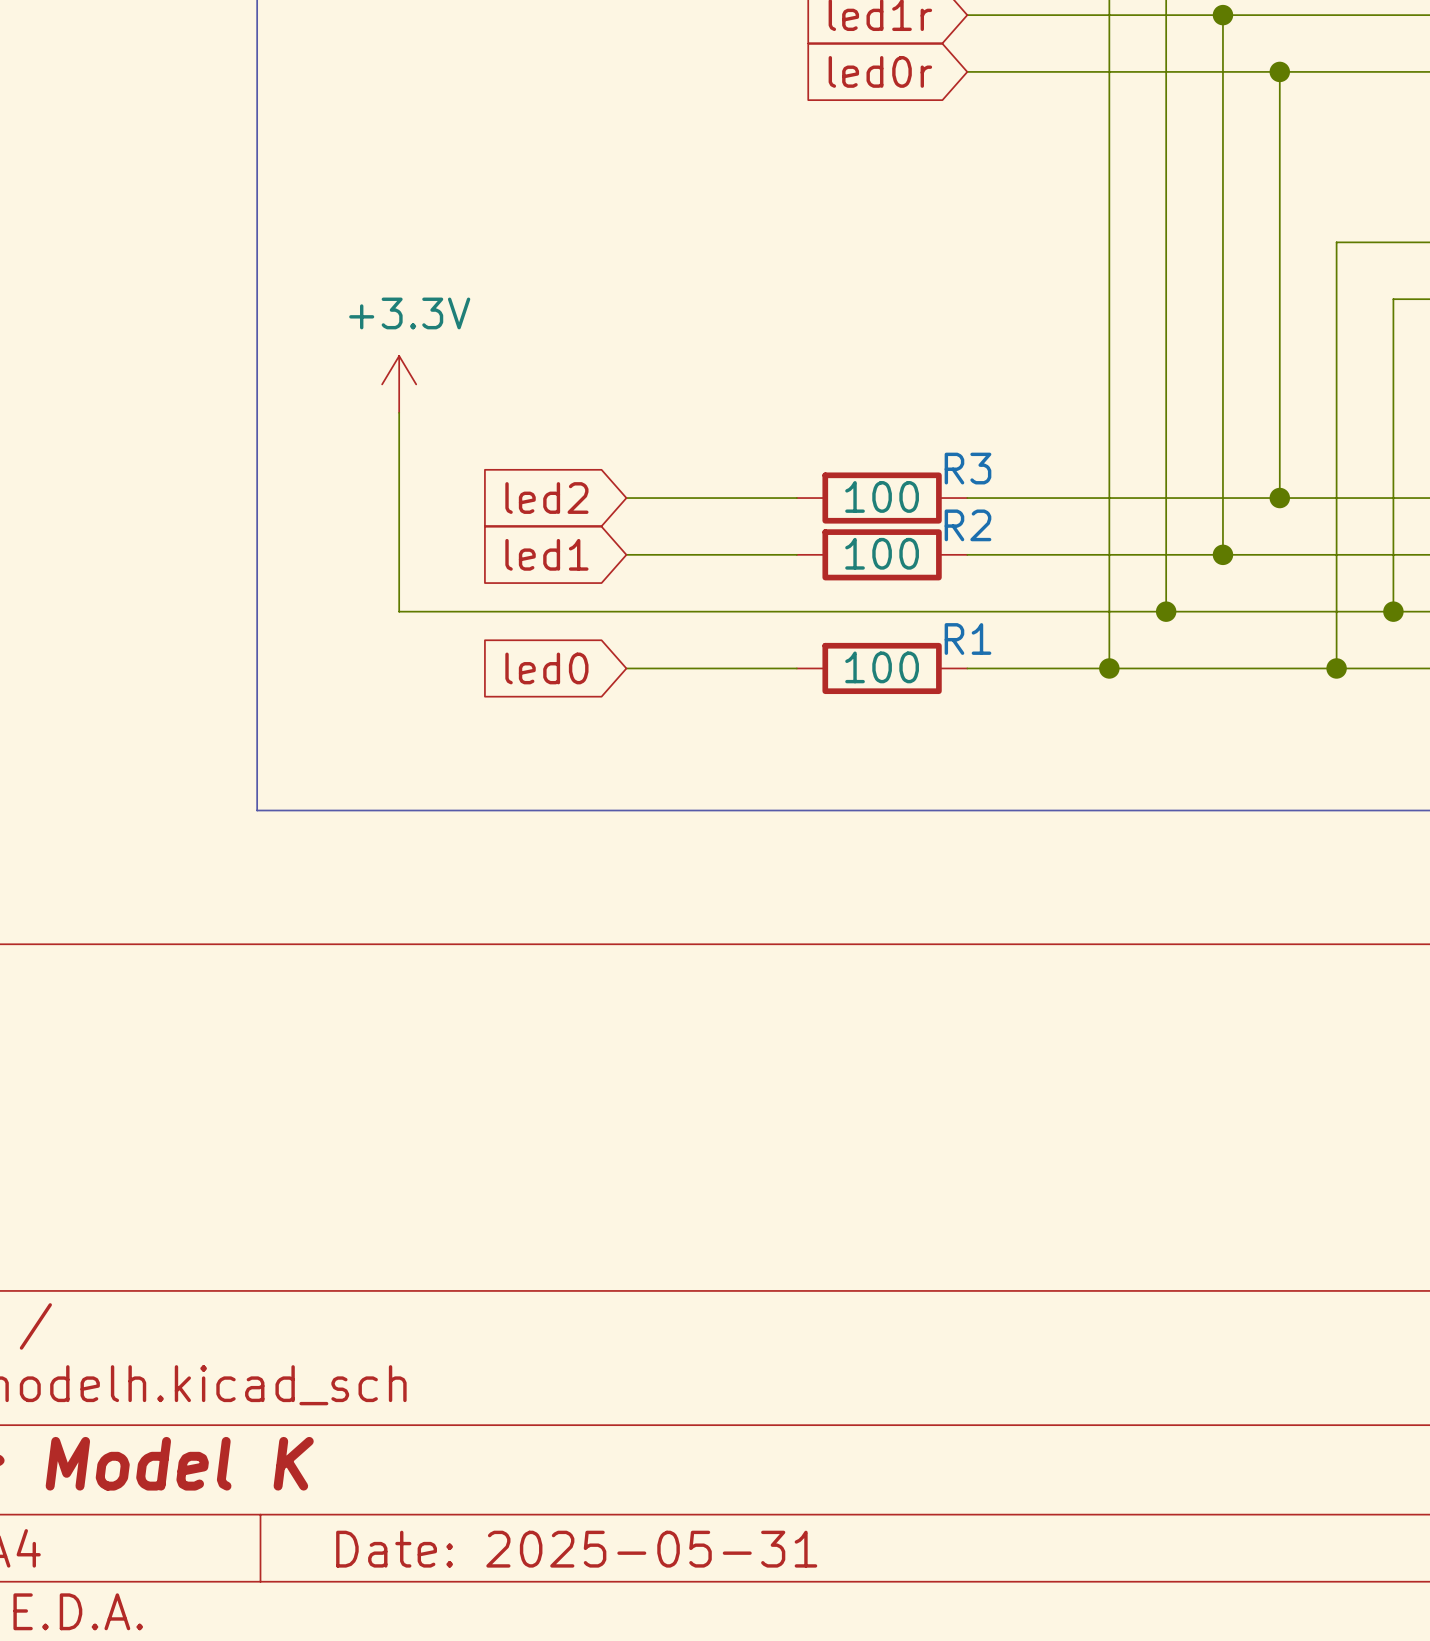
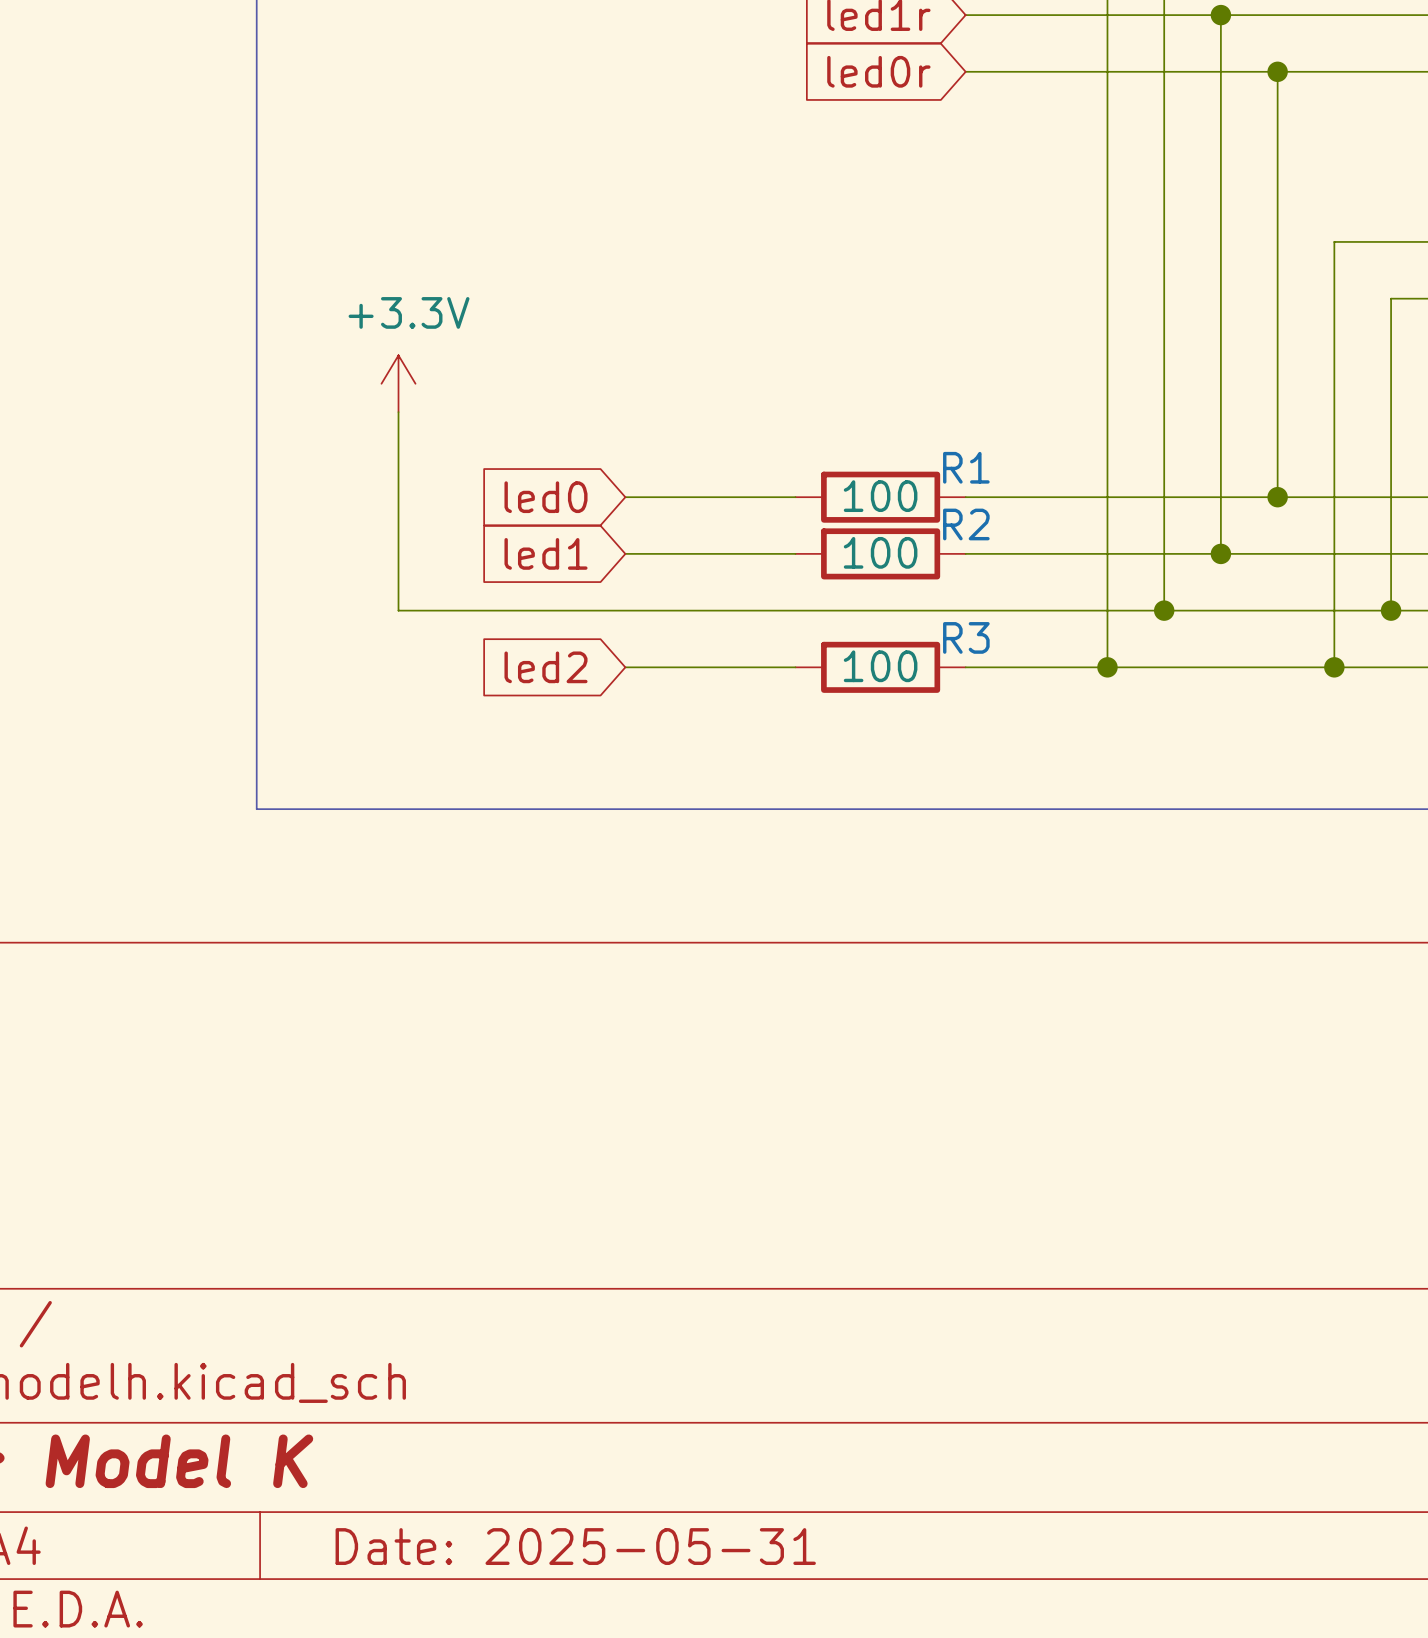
R3 name: R3 (967, 468) -> R1 (966, 467)
global label: led2 (546, 498) -> led0 (545, 497)
R1 name: R1 (967, 639) -> R3 (966, 637)
global label: led0 (546, 668) -> led2 (545, 667)

